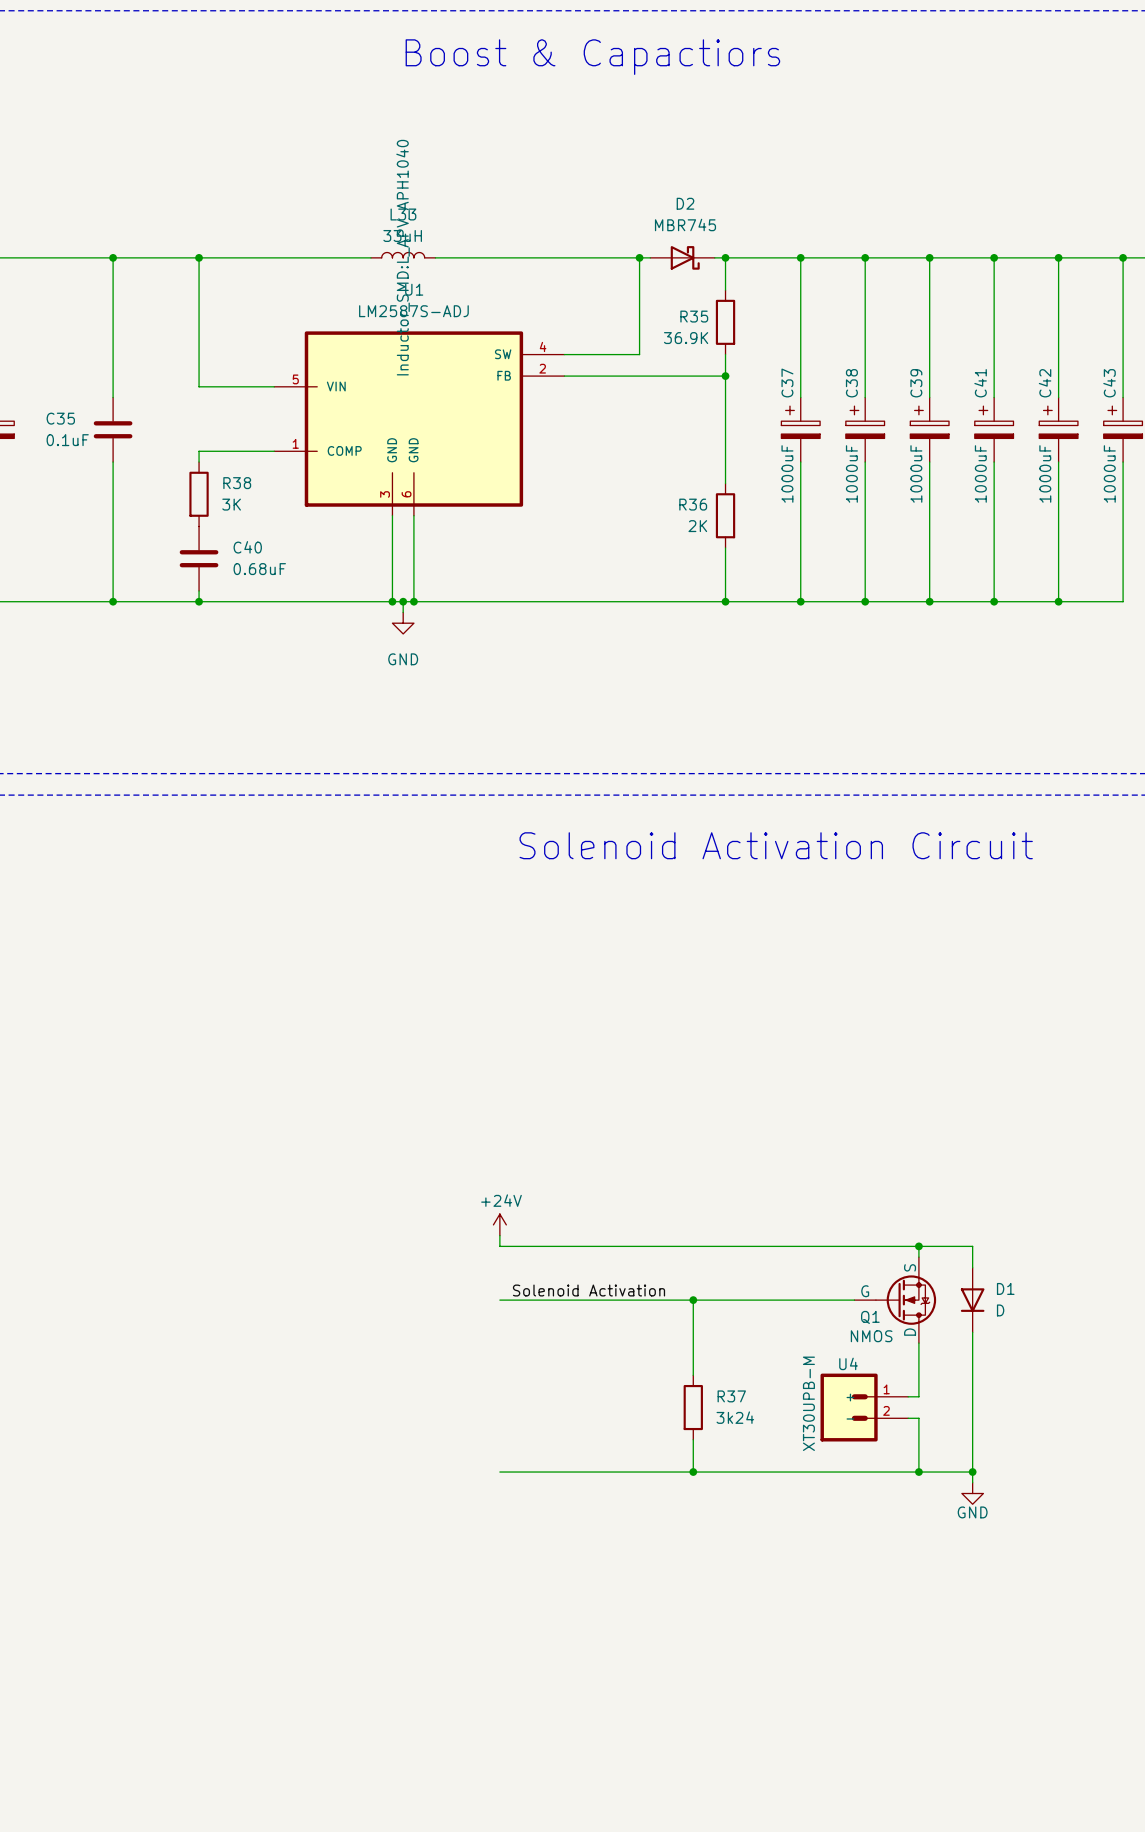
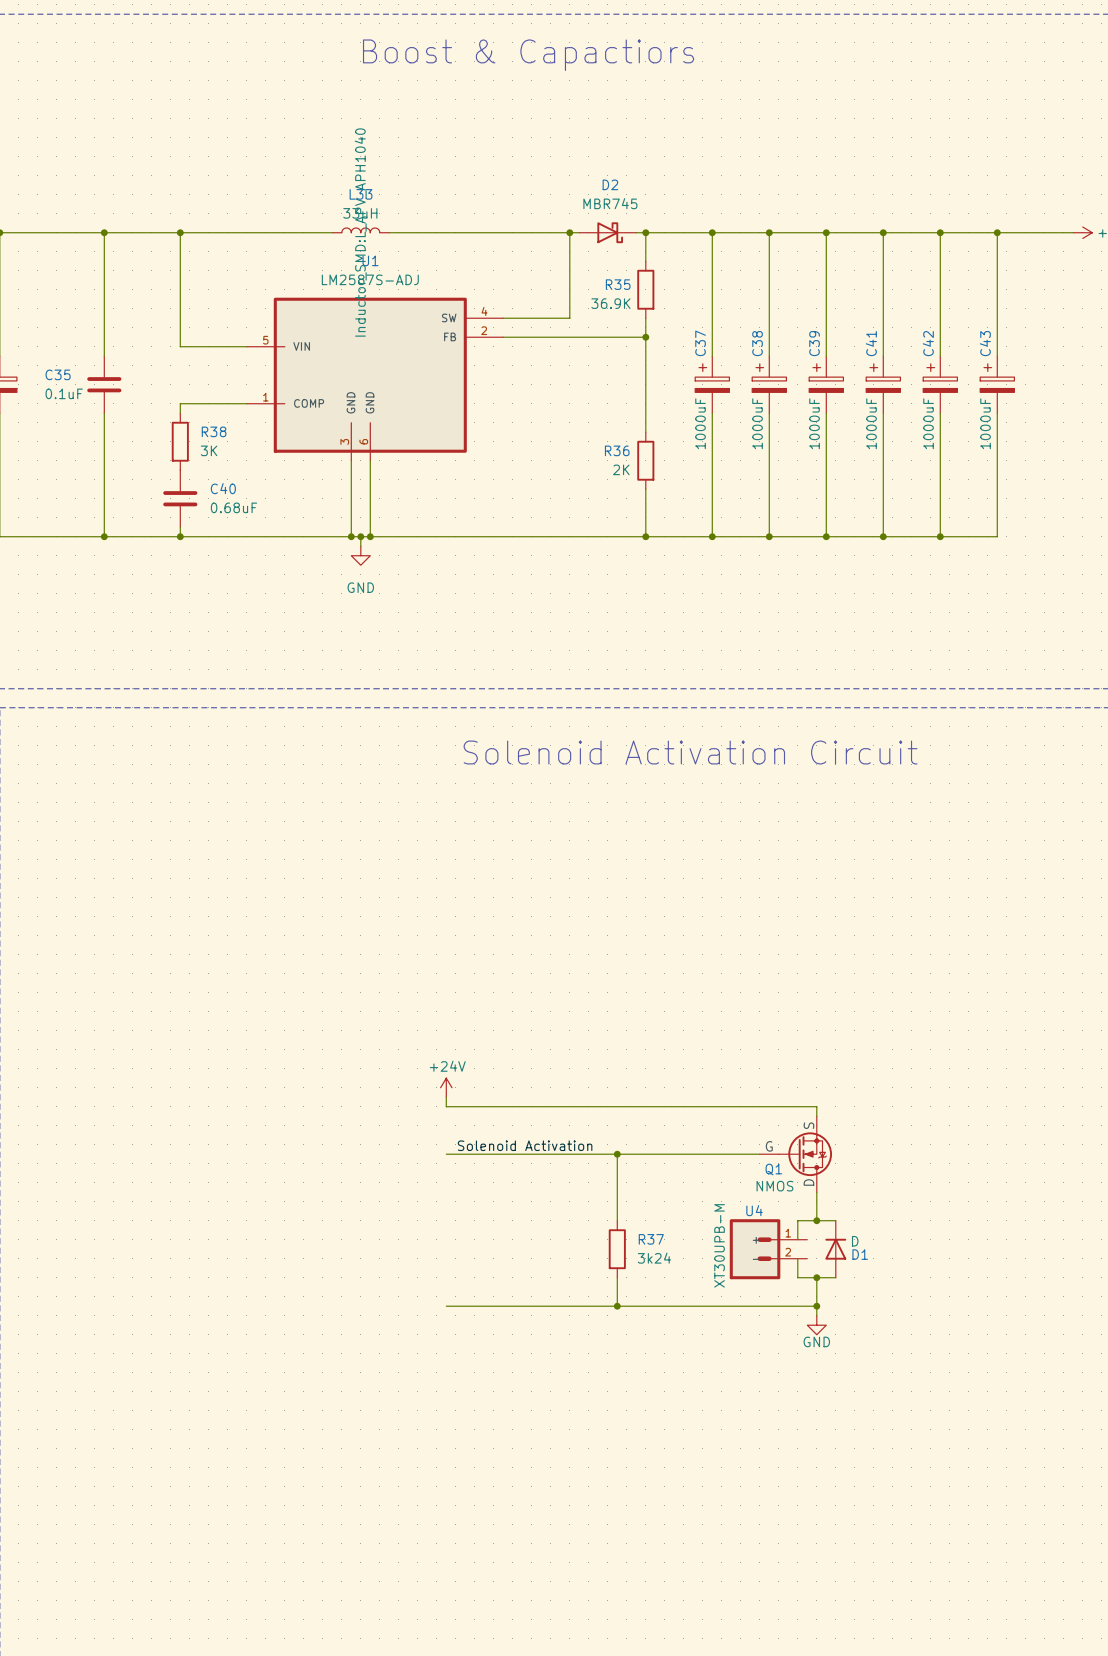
wire: (918, 1246) (972, 1246) (972, 1267) -> none
junction: (918, 1246) -> none
D1 name position: D1 (1005, 1288) -> D1 (860, 1254)
D1 rotation: 0° (972, 1300) -> 180° (835, 1249)
D1 position: (972, 1300) -> (835, 1249)
D1 value position: D (1000, 1310) -> D (855, 1241)
wire: (972, 1332) (972, 1482) -> none
wire: (918, 1375) (918, 1396) (908, 1396) -> none
junction: none -> (816, 1220)
wire: none -> (835, 1220) (797, 1220) (797, 1239)
wire: none -> (797, 1258) (797, 1277) (835, 1277)
wire: (908, 1418) (918, 1418) (918, 1439) -> none
junction: none -> (816, 1277)
wire: (918, 1472) (972, 1472) -> (816, 1306) (816, 1315)
junction: (972, 1472) -> none
power symbol position: GND (972, 1493) -> GND (816, 1325)

